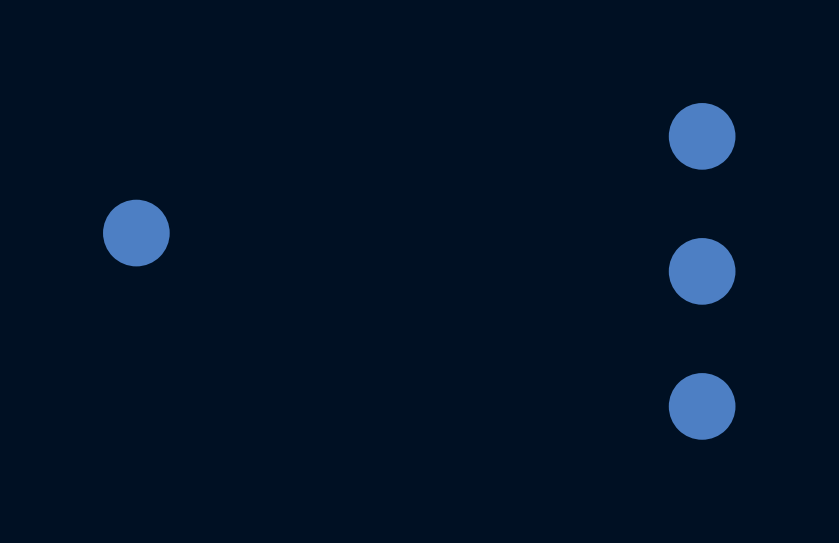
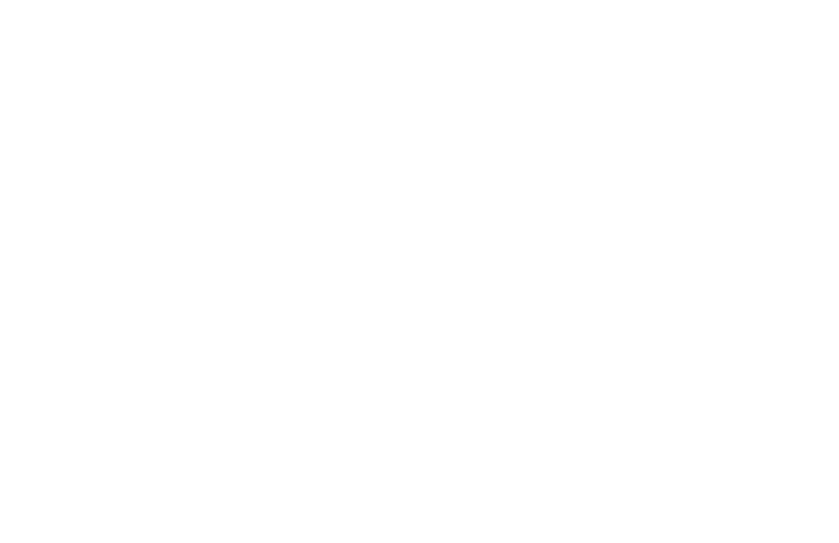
part: (702, 136) -> none
part: (136, 233) -> none
part: (702, 271) -> none
part: (702, 406) -> none

